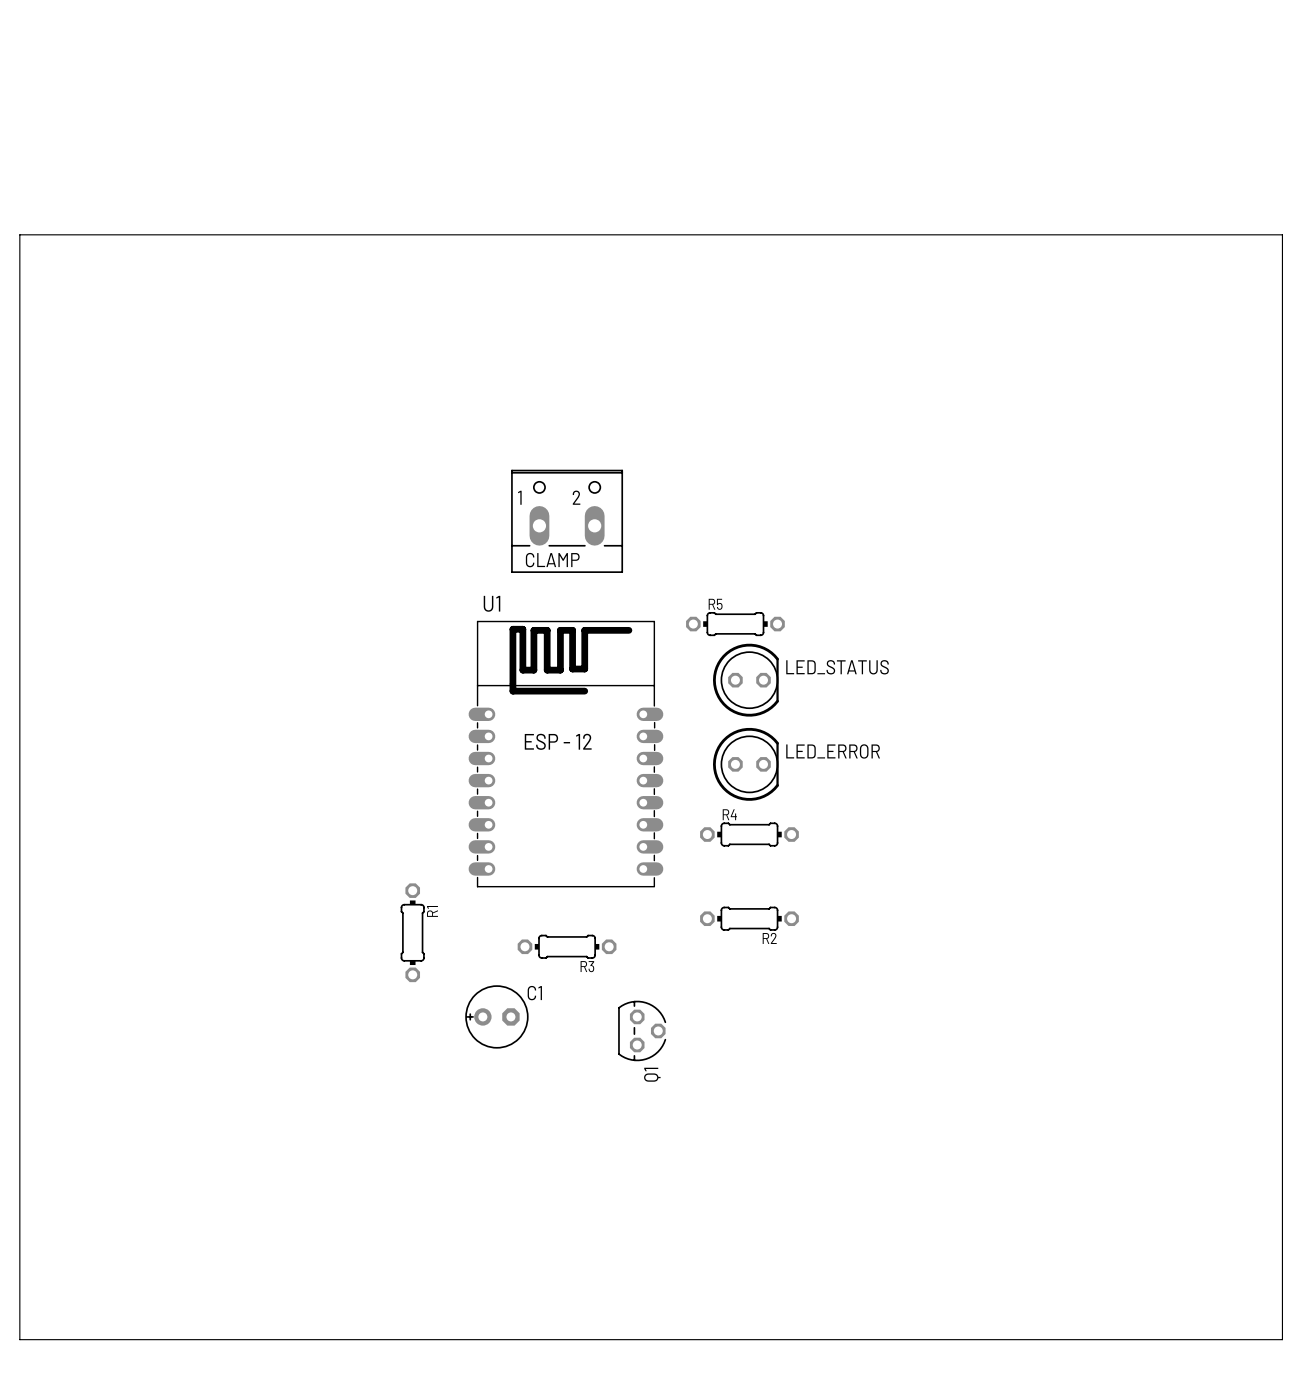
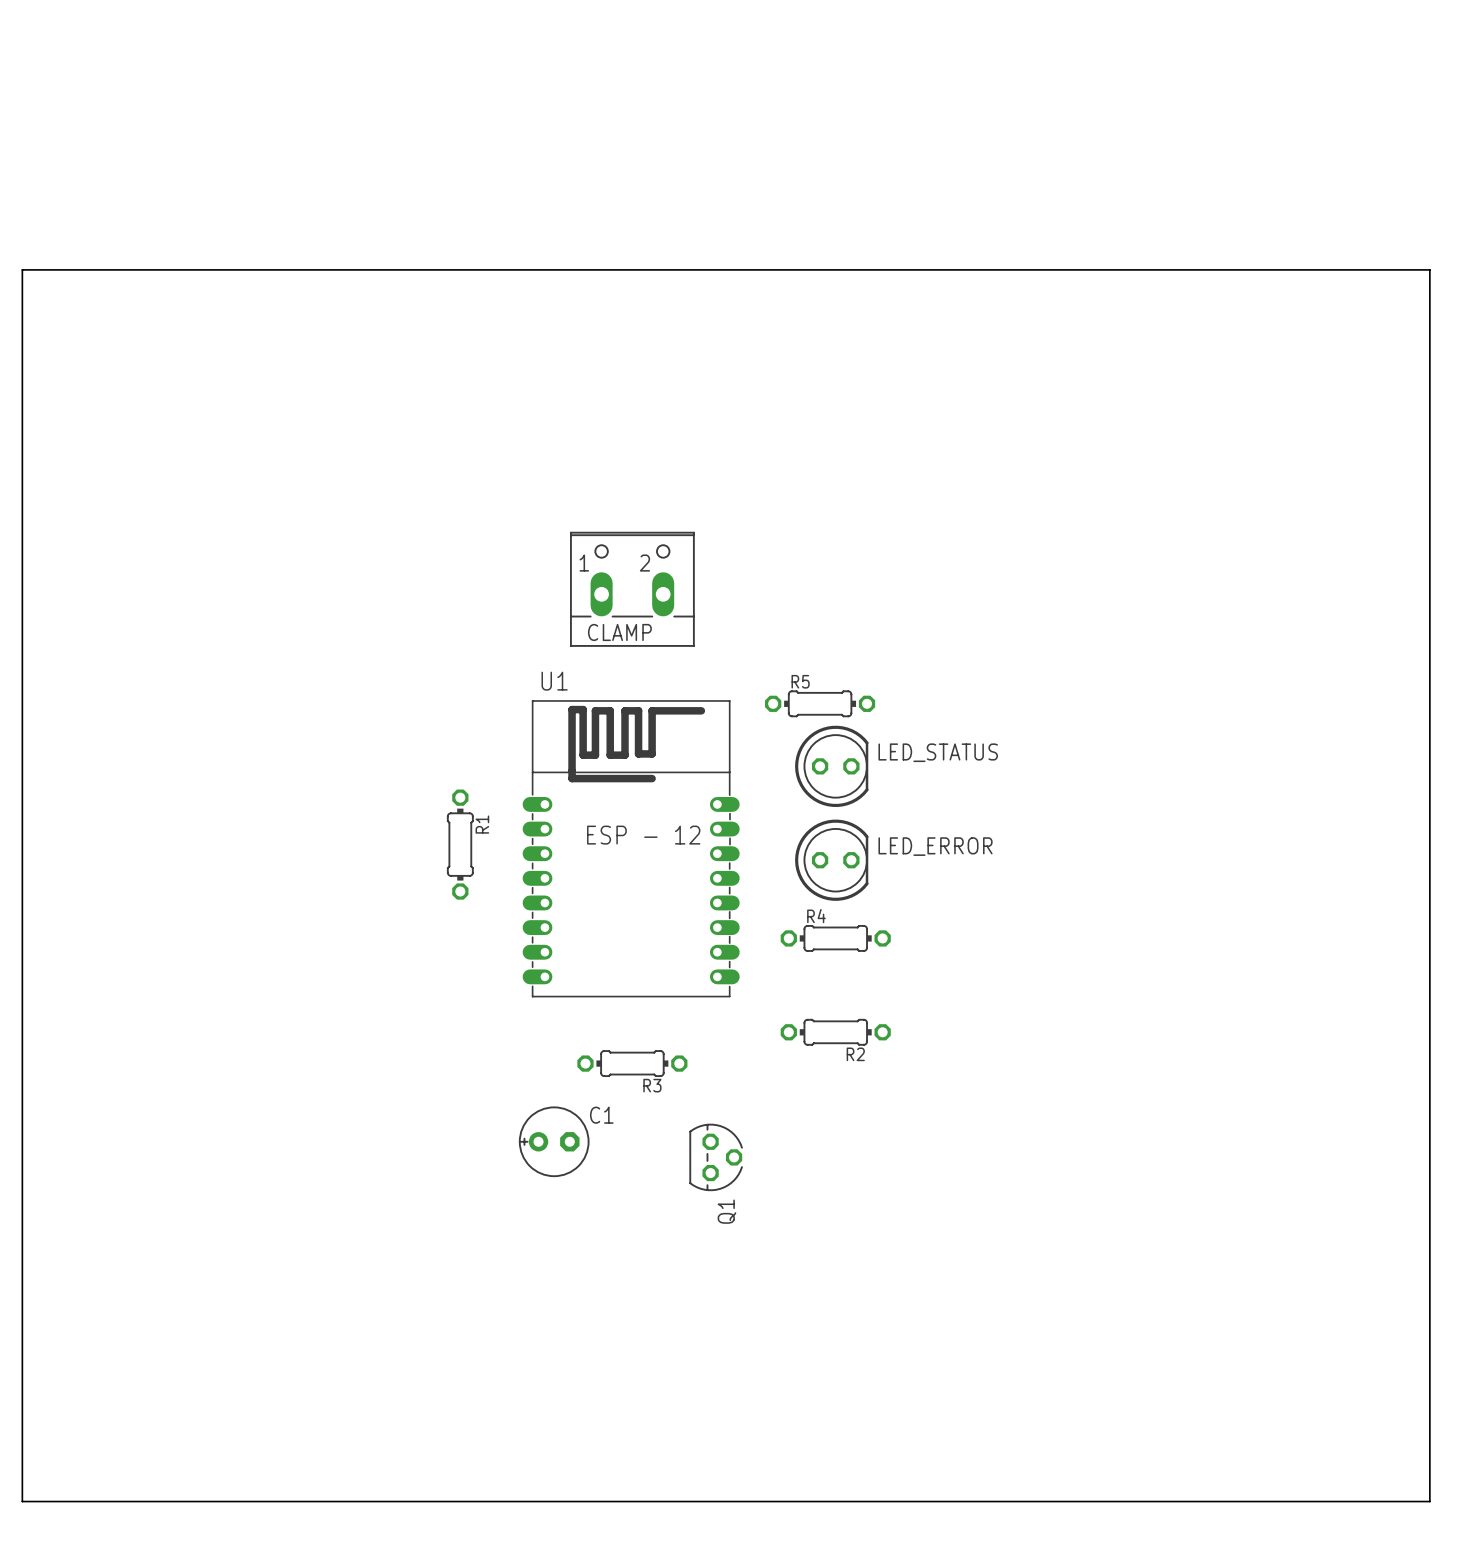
R1 position: (412, 932) -> (460, 844)

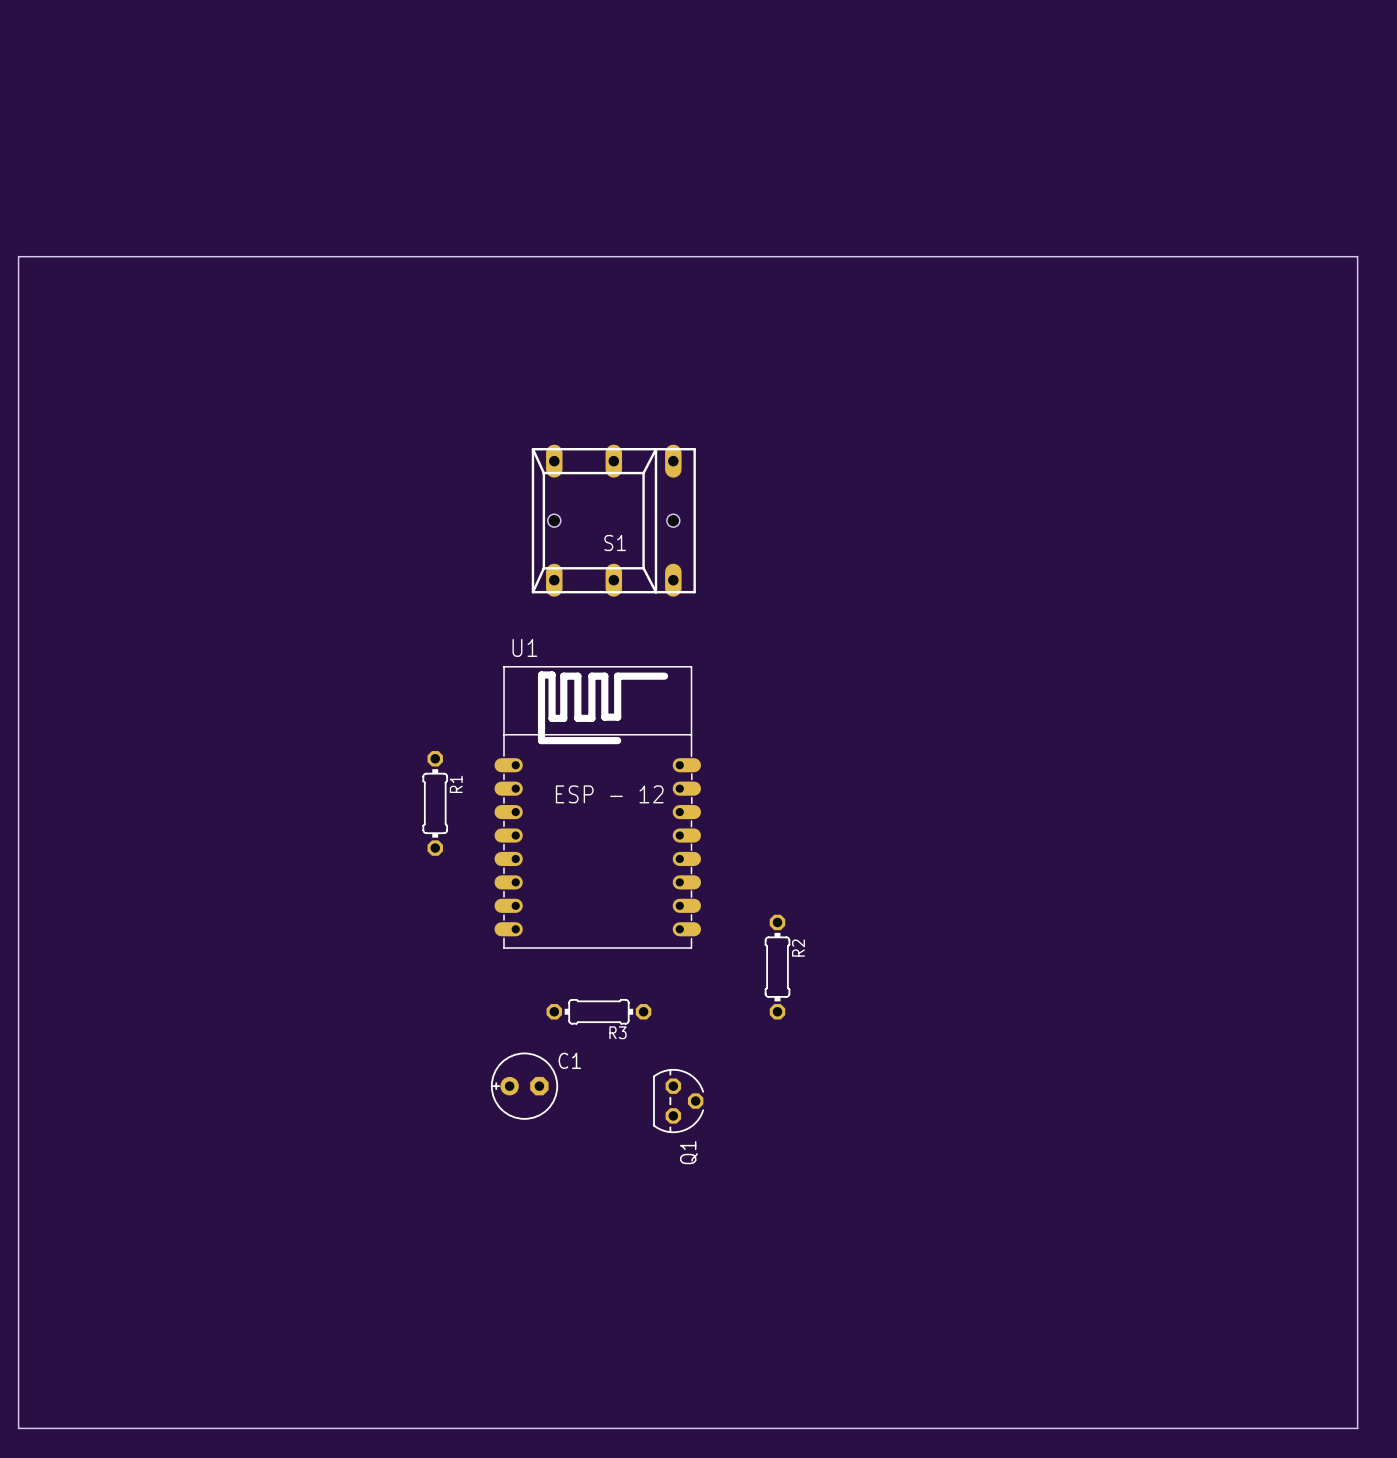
S1: none -> (613, 520)
CLAMP: (632, 589) -> none
R5: (820, 703) -> none
LED_STATUS: (831, 766) -> none
LED_ERROR: (831, 860) -> none
R4: (835, 938) -> none
R2 rotation: 0° (835, 1032) -> 90° clockwise (777, 967)
R2 name position: R2 (855, 1054) -> R2 (798, 948)

